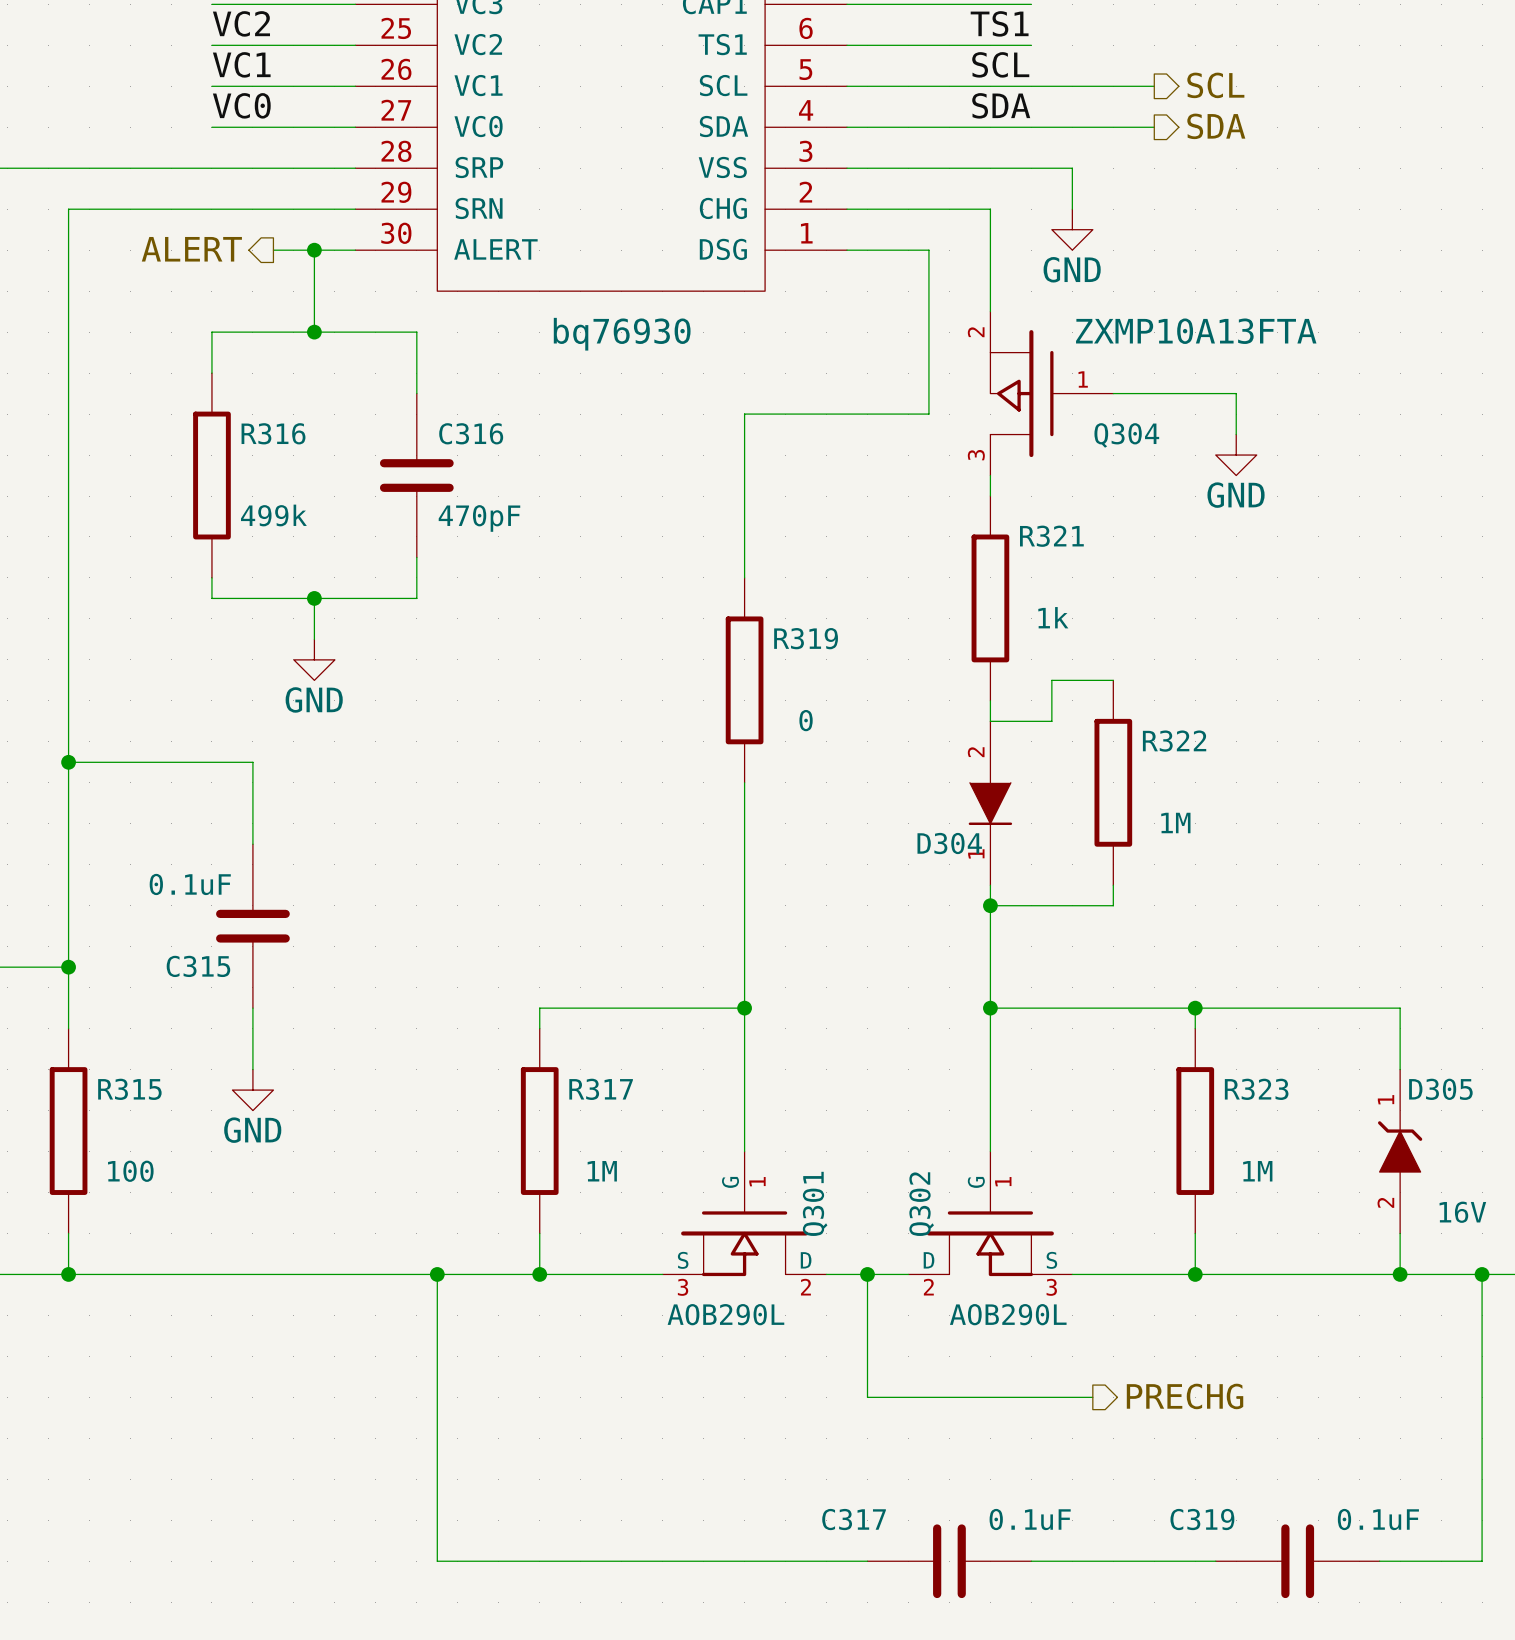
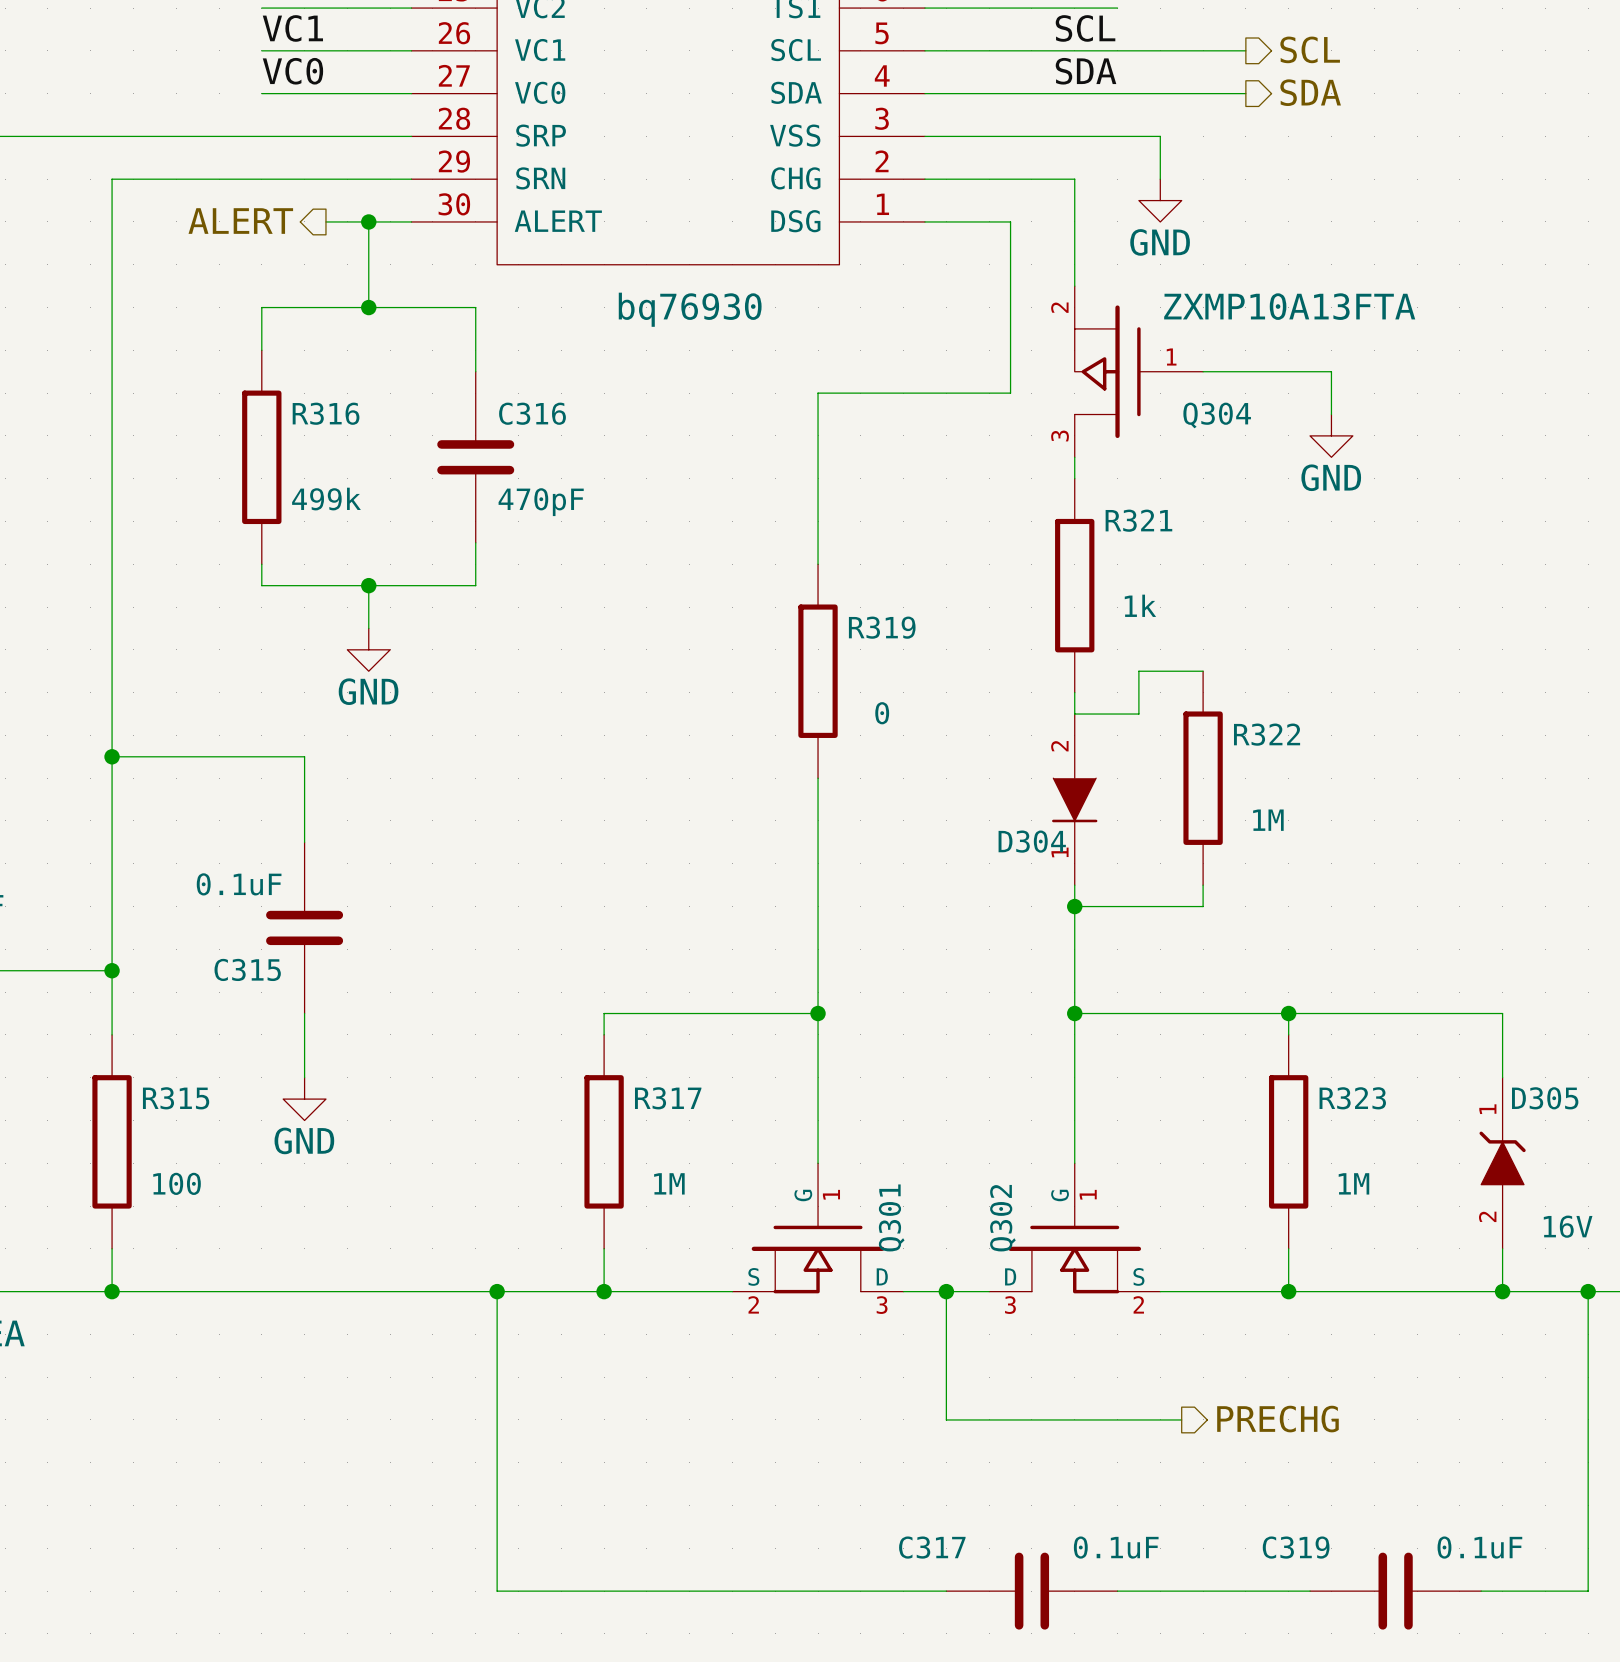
Q301 pin number: 3 (683, 1287) -> 2 (753, 1304)
Q301 pin number: 2 (805, 1287) -> 3 (882, 1305)
Q302 pin number: 2 (928, 1287) -> 3 (1010, 1305)
Q302 pin number: 3 (1051, 1287) -> 2 (1138, 1304)
Q301 value: AOB290L (725, 1314) -> none
Q302 value: AOB290L (1008, 1314) -> none

